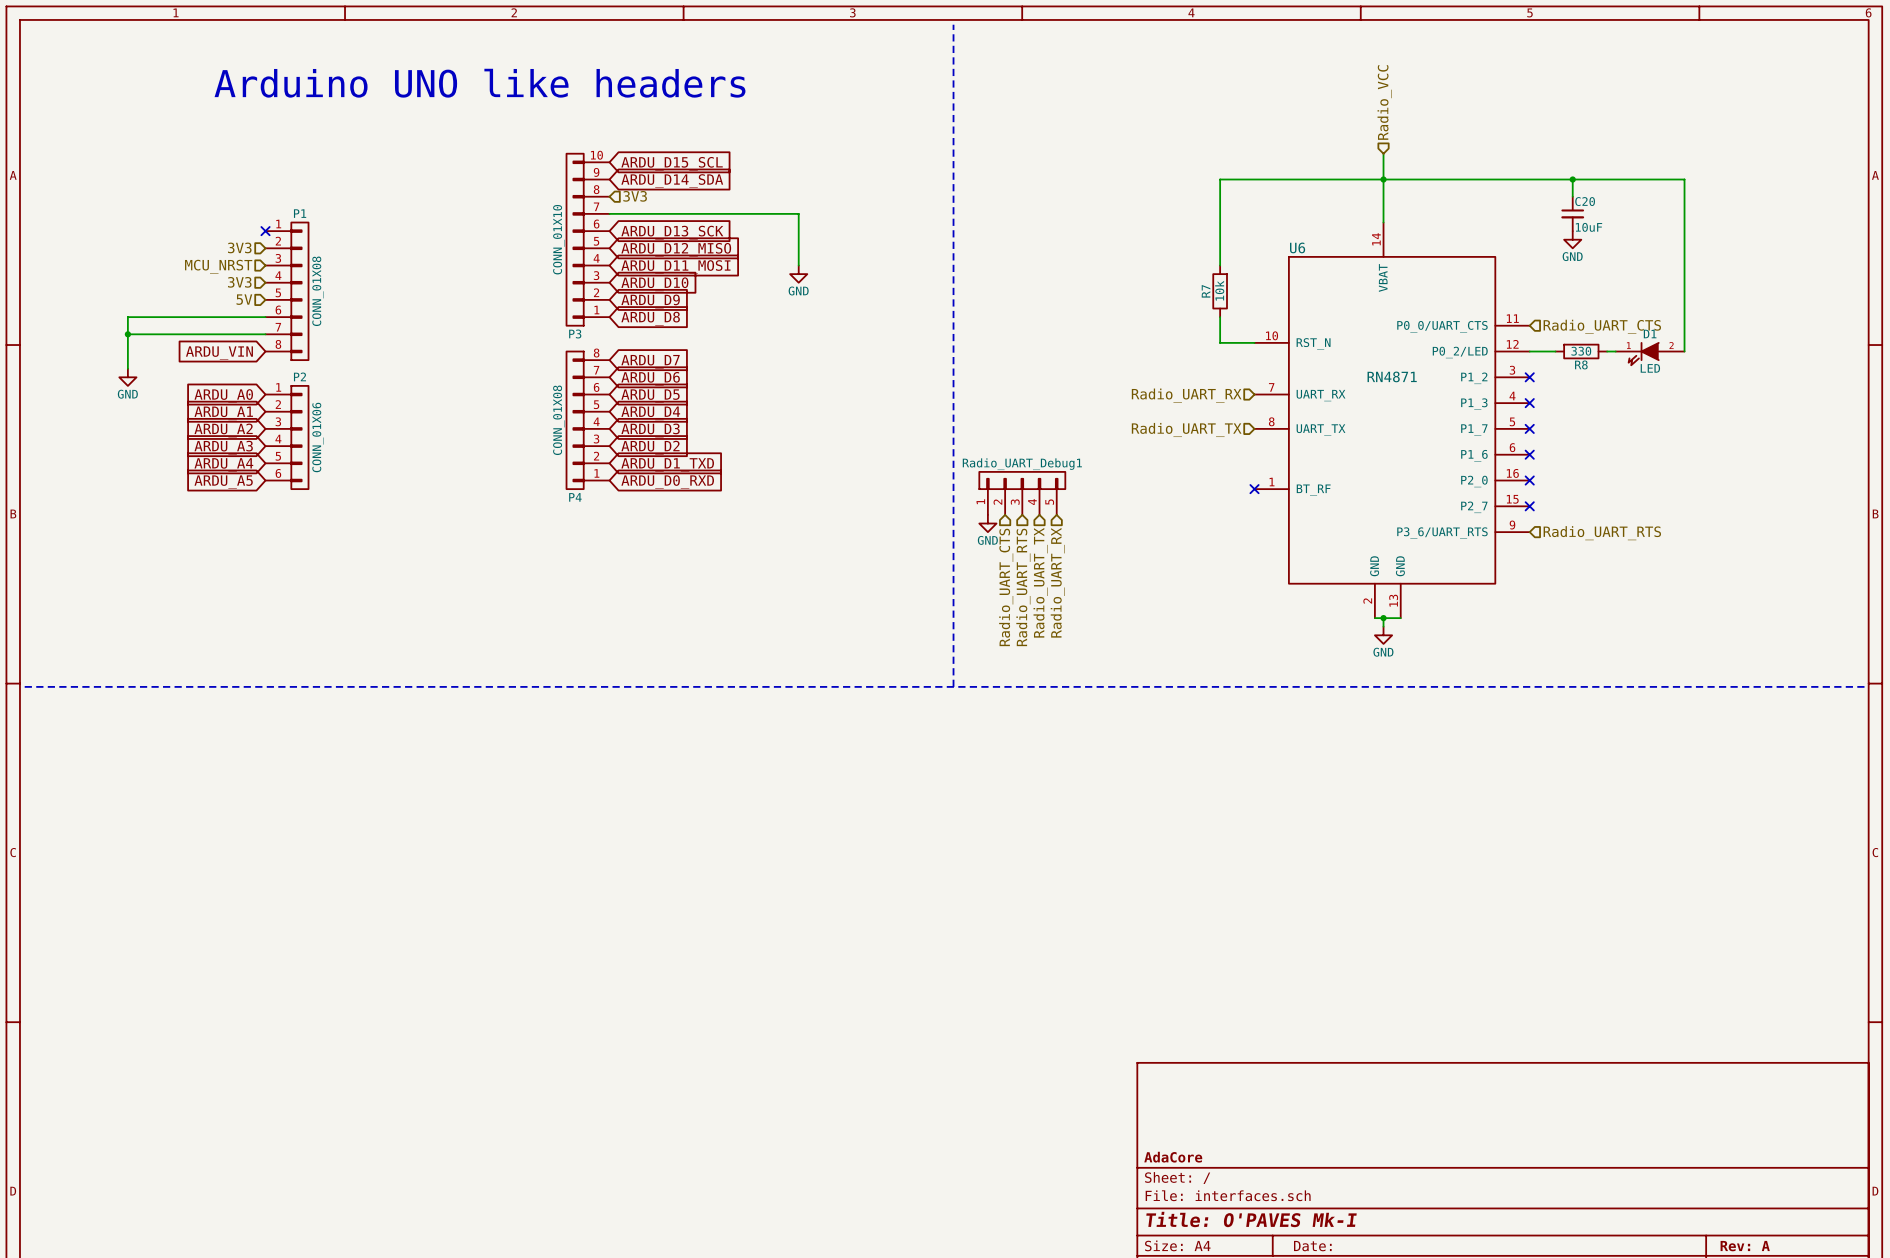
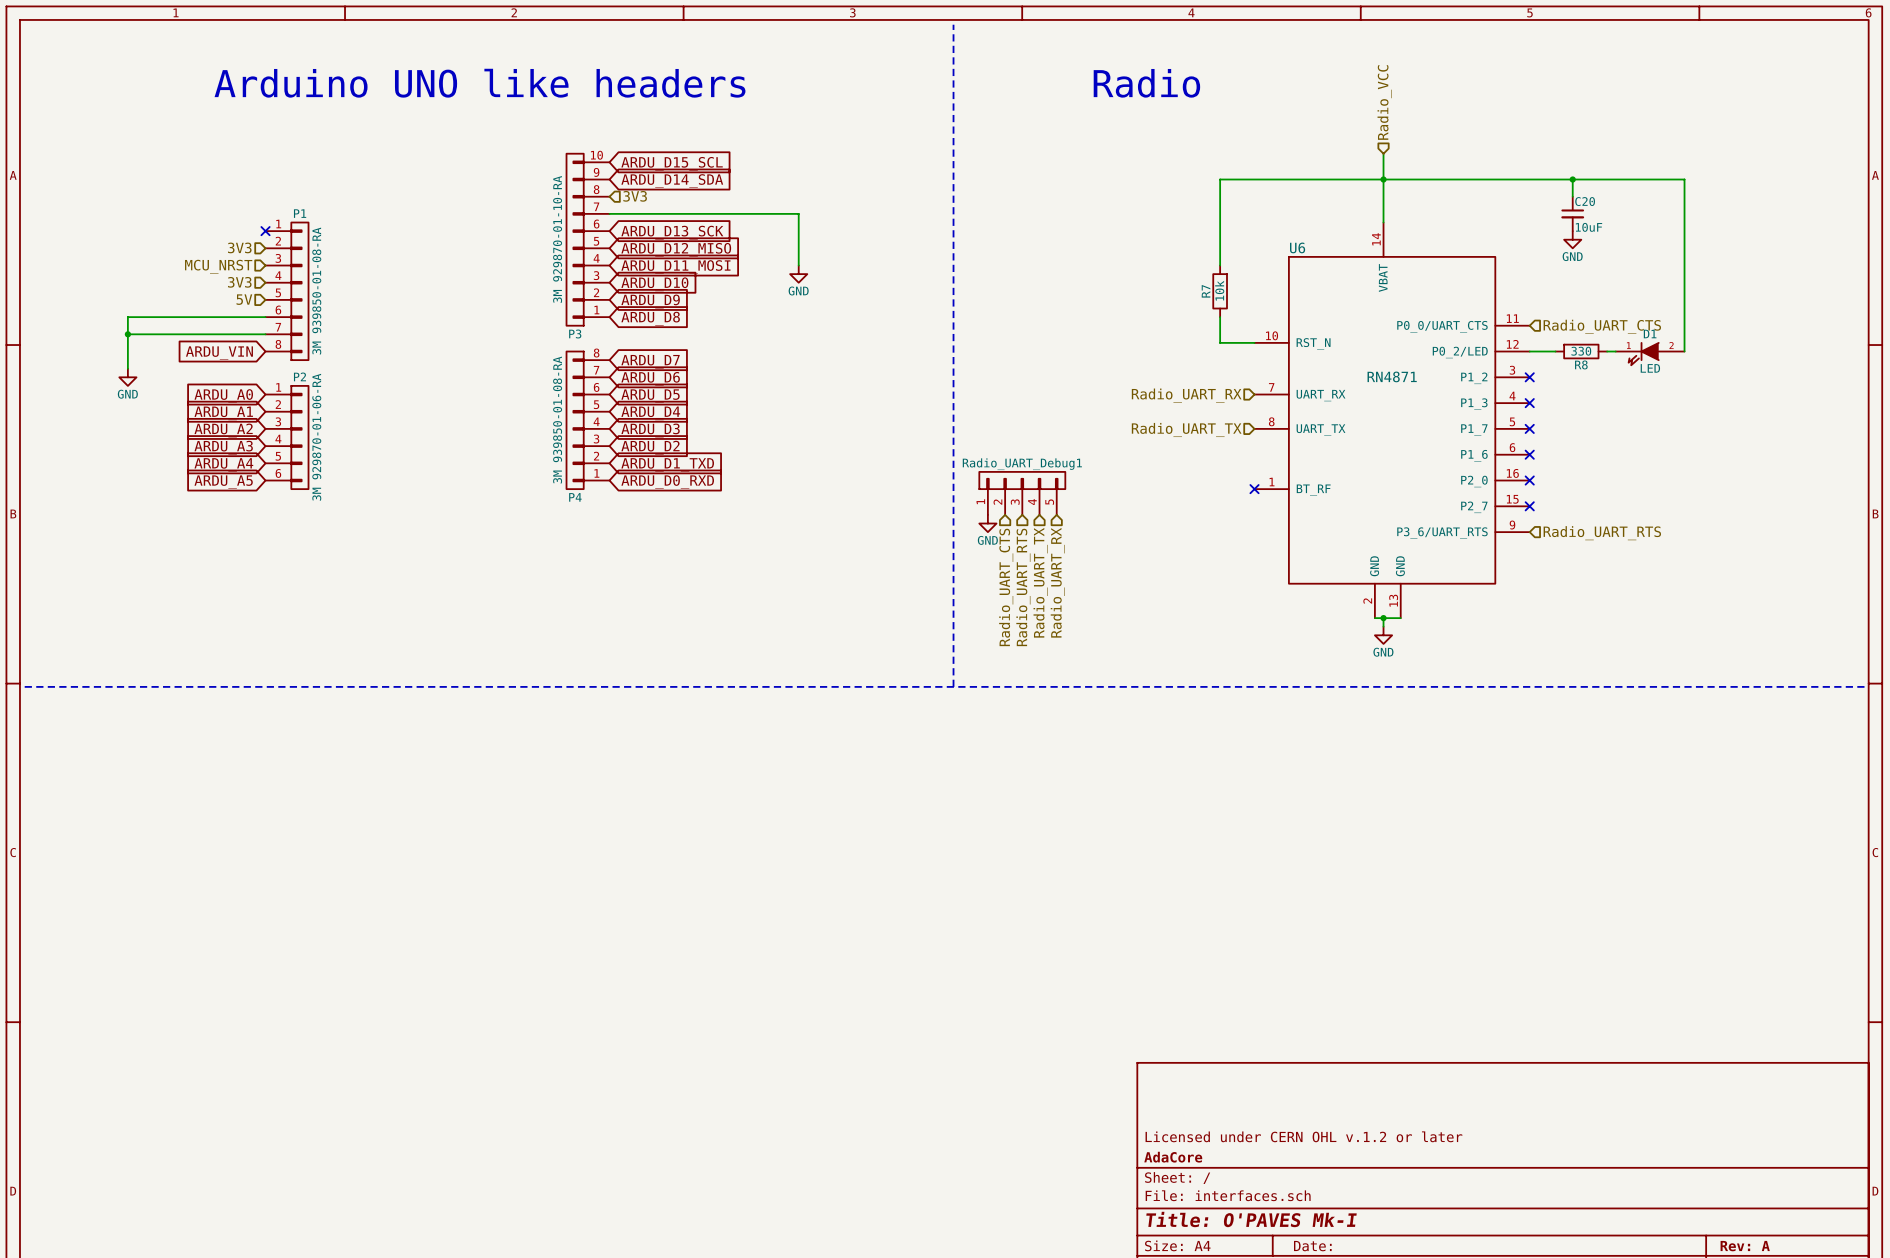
text: none -> Radio (1146, 83)
P3 value: CONN_01X10 (558, 239) -> 3M 929870-01-10-RA (557, 239)
P1 value: CONN_01X08 (318, 291) -> 3M 939850-01-08-RA (316, 291)
P4 value: CONN_01X08 (558, 420) -> 3M 939850-01-08-RA (557, 420)
P2 value: CONN_01X06 (318, 437) -> 3M 929870-01-06-RA (316, 437)
title block: none -> Licensed under CERN OHL v.1.2 or later (1303, 1136)

